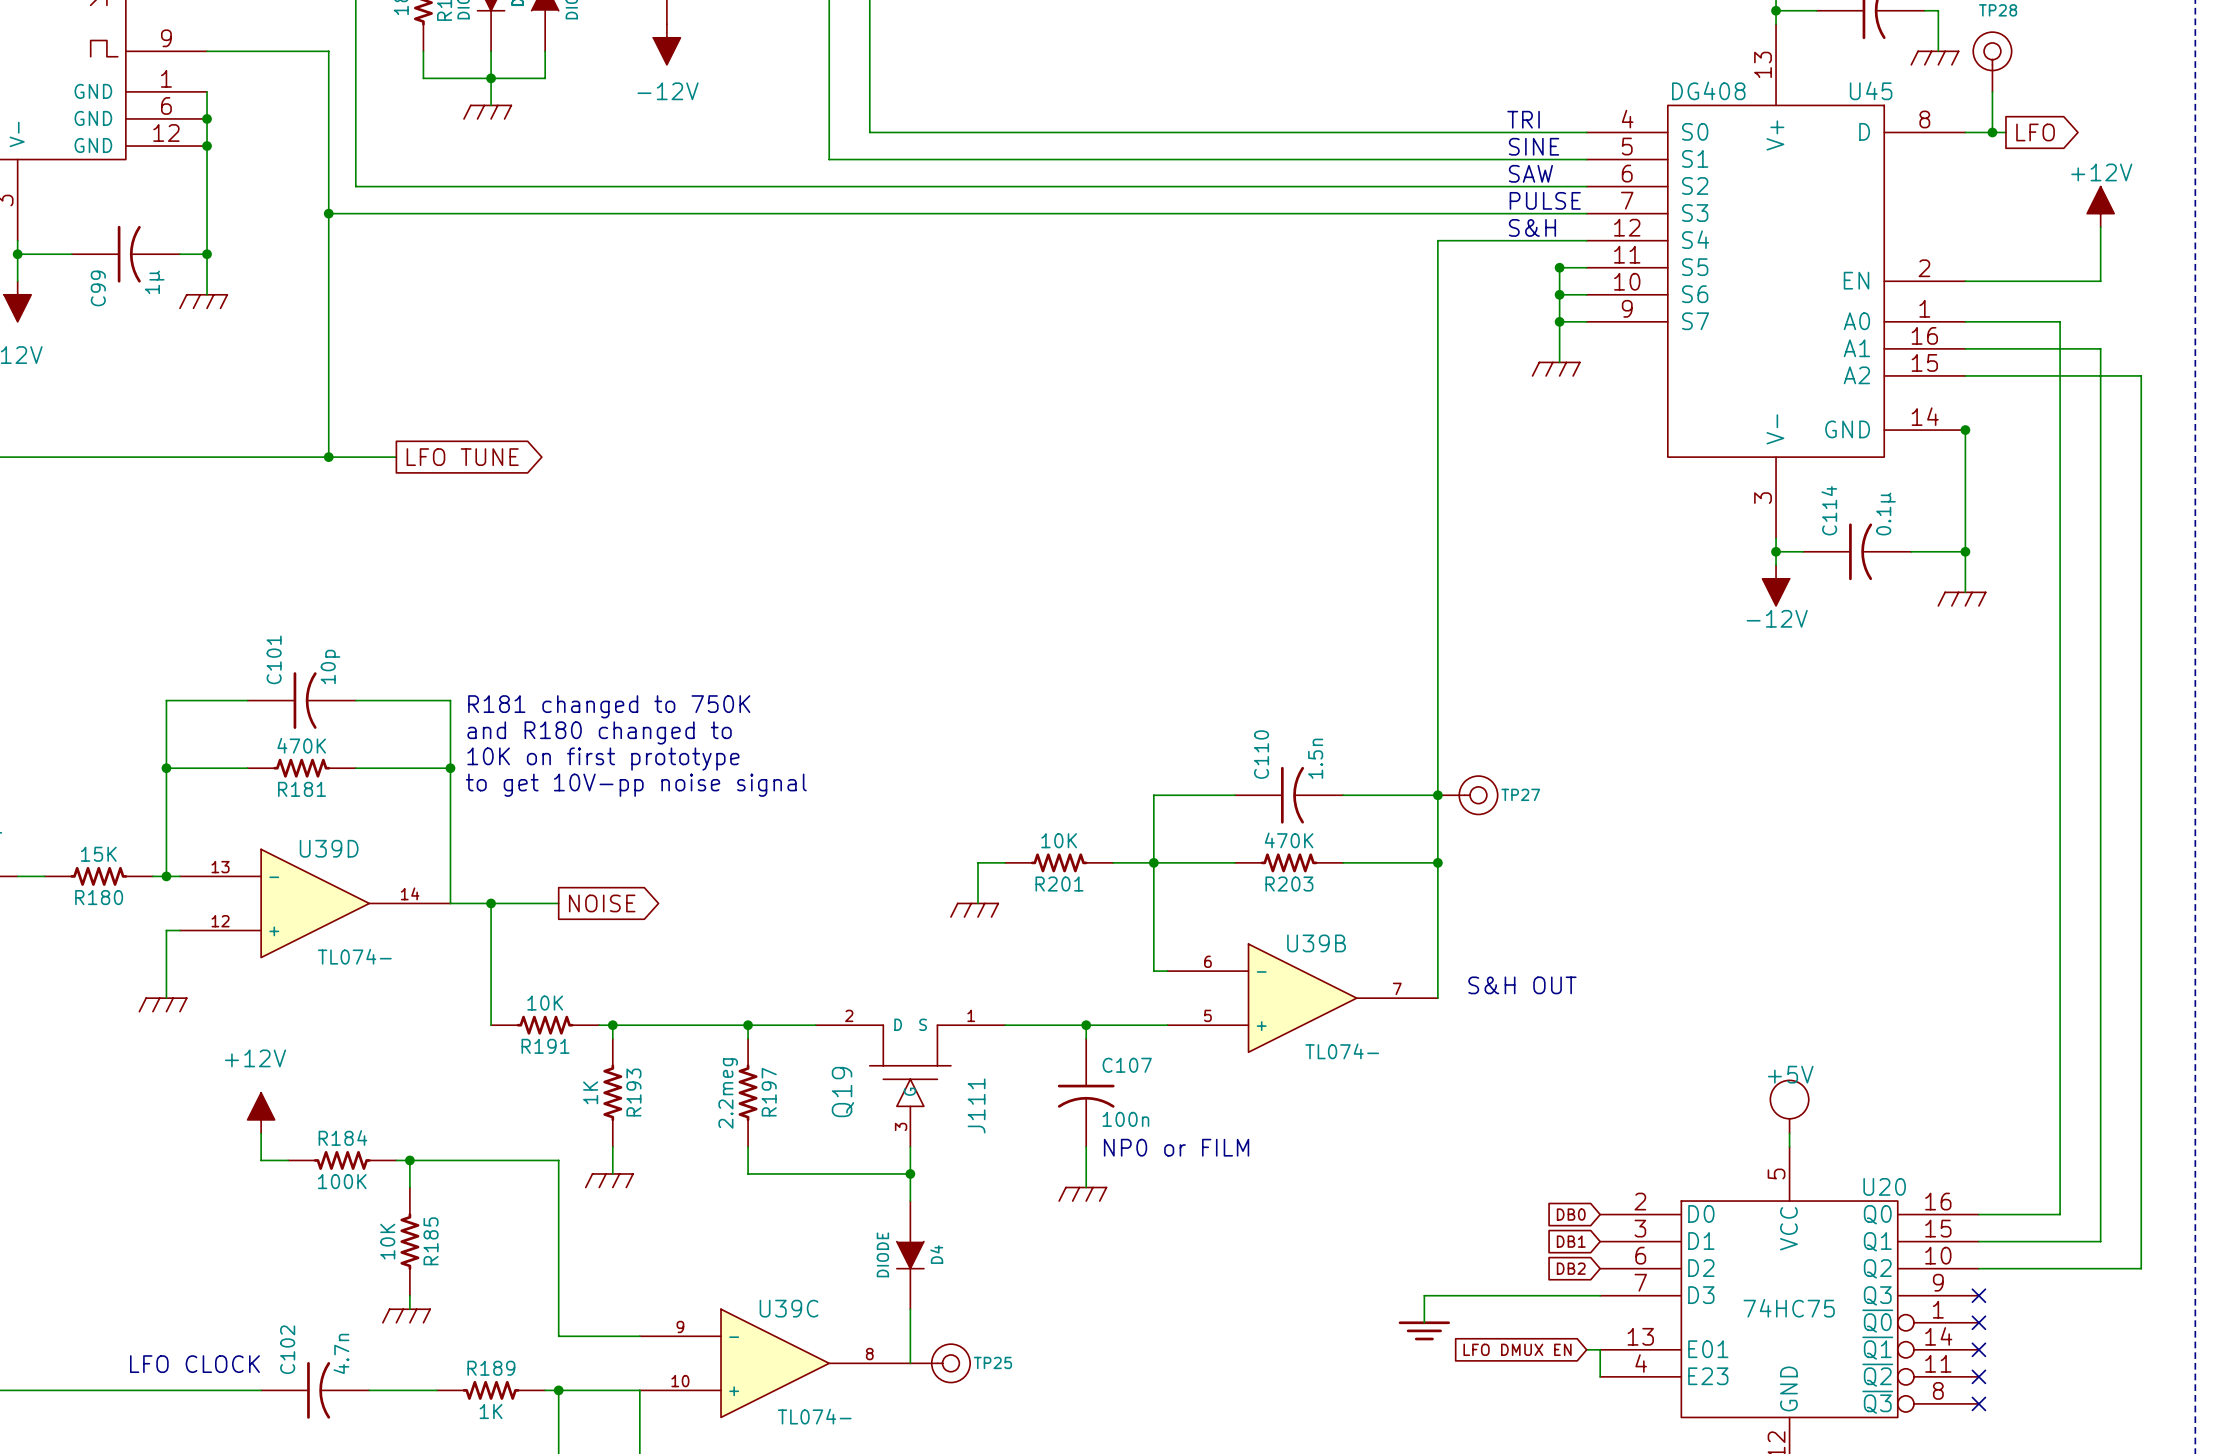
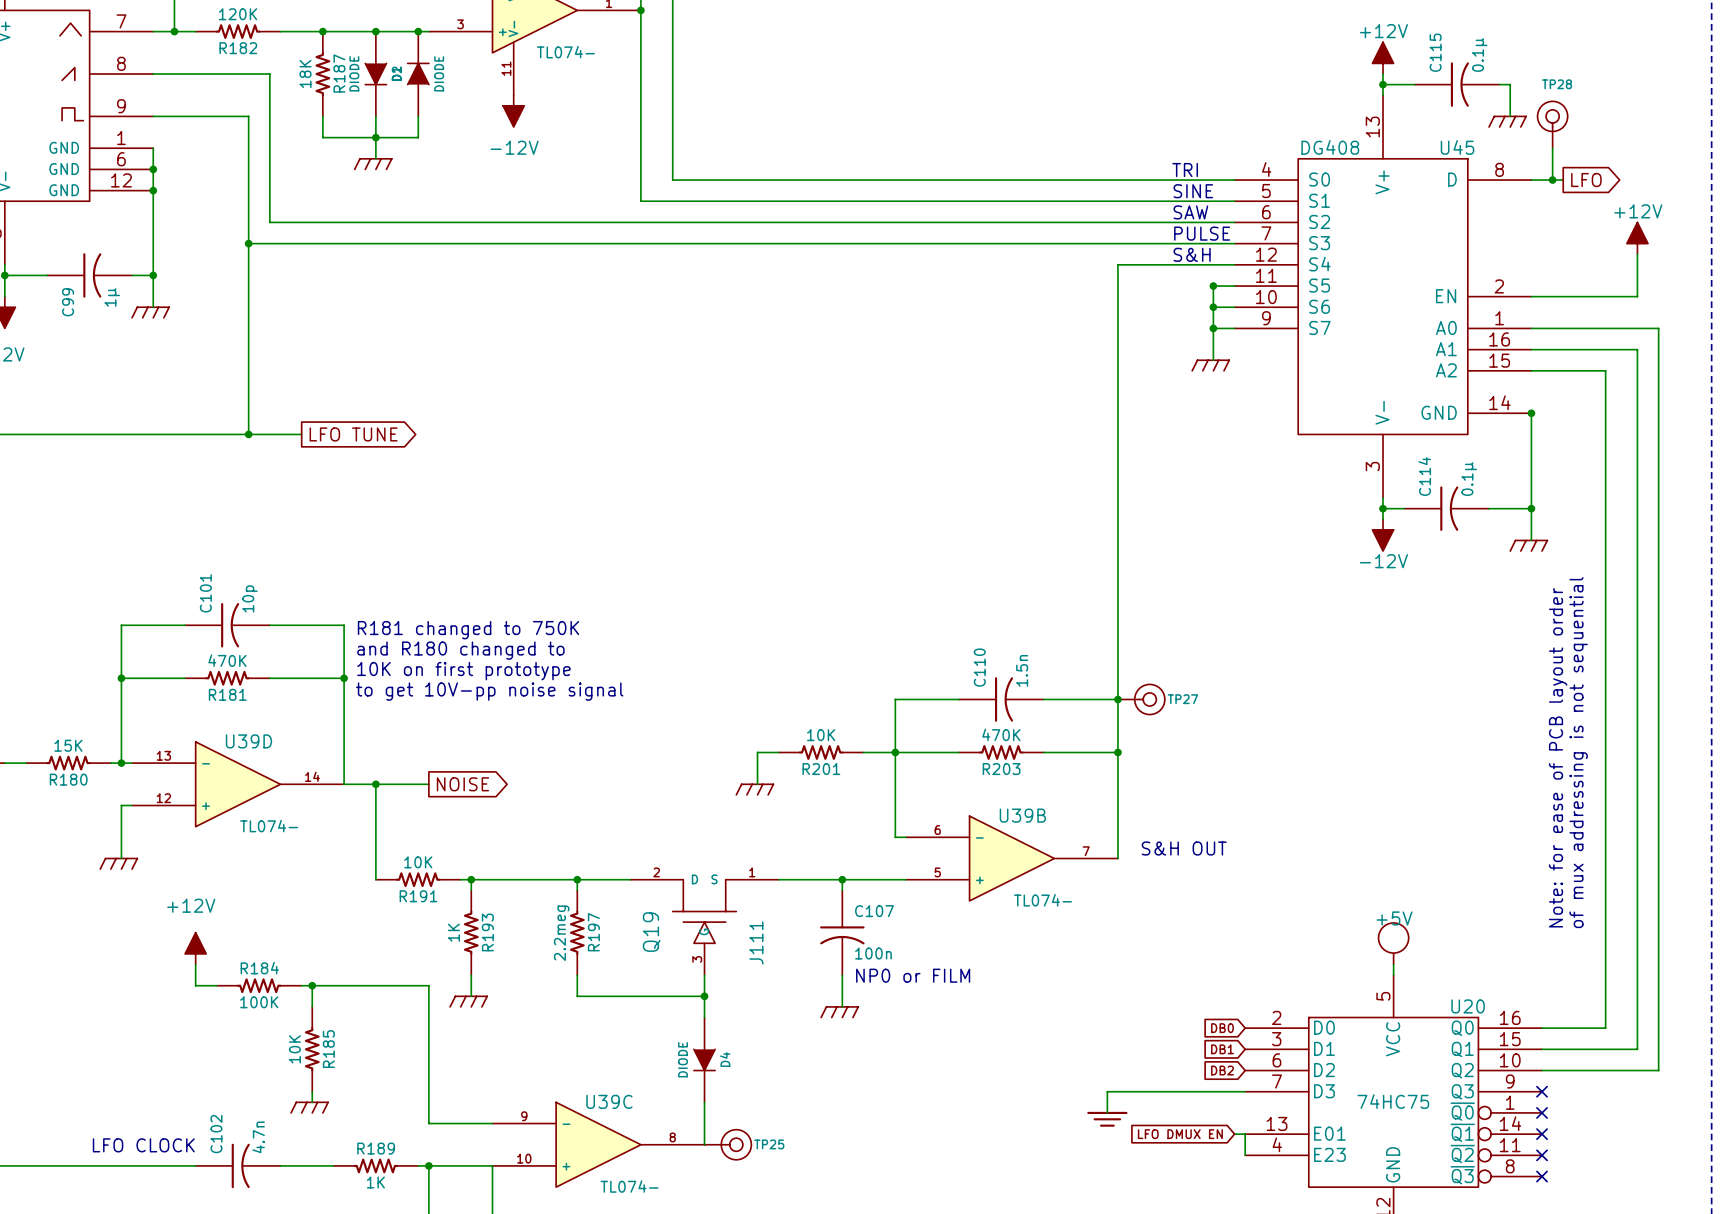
wire: (2060, 321) (2060, 375) (2141, 375) (2141, 1268) (2127, 1268) -> (1605, 328) (1658, 328) (1658, 1070)
text: none -> of mux addressing is not sequential (1578, 752)
text: none -> Note: for ease of PCB layout order (1558, 757)

